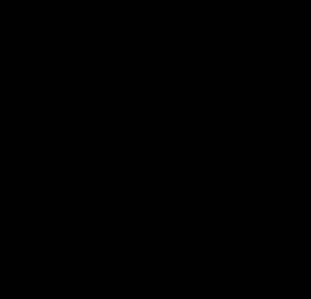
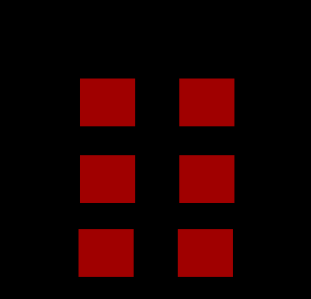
part: none -> (157, 102)
part: none -> (157, 179)
part: none -> (155, 253)

